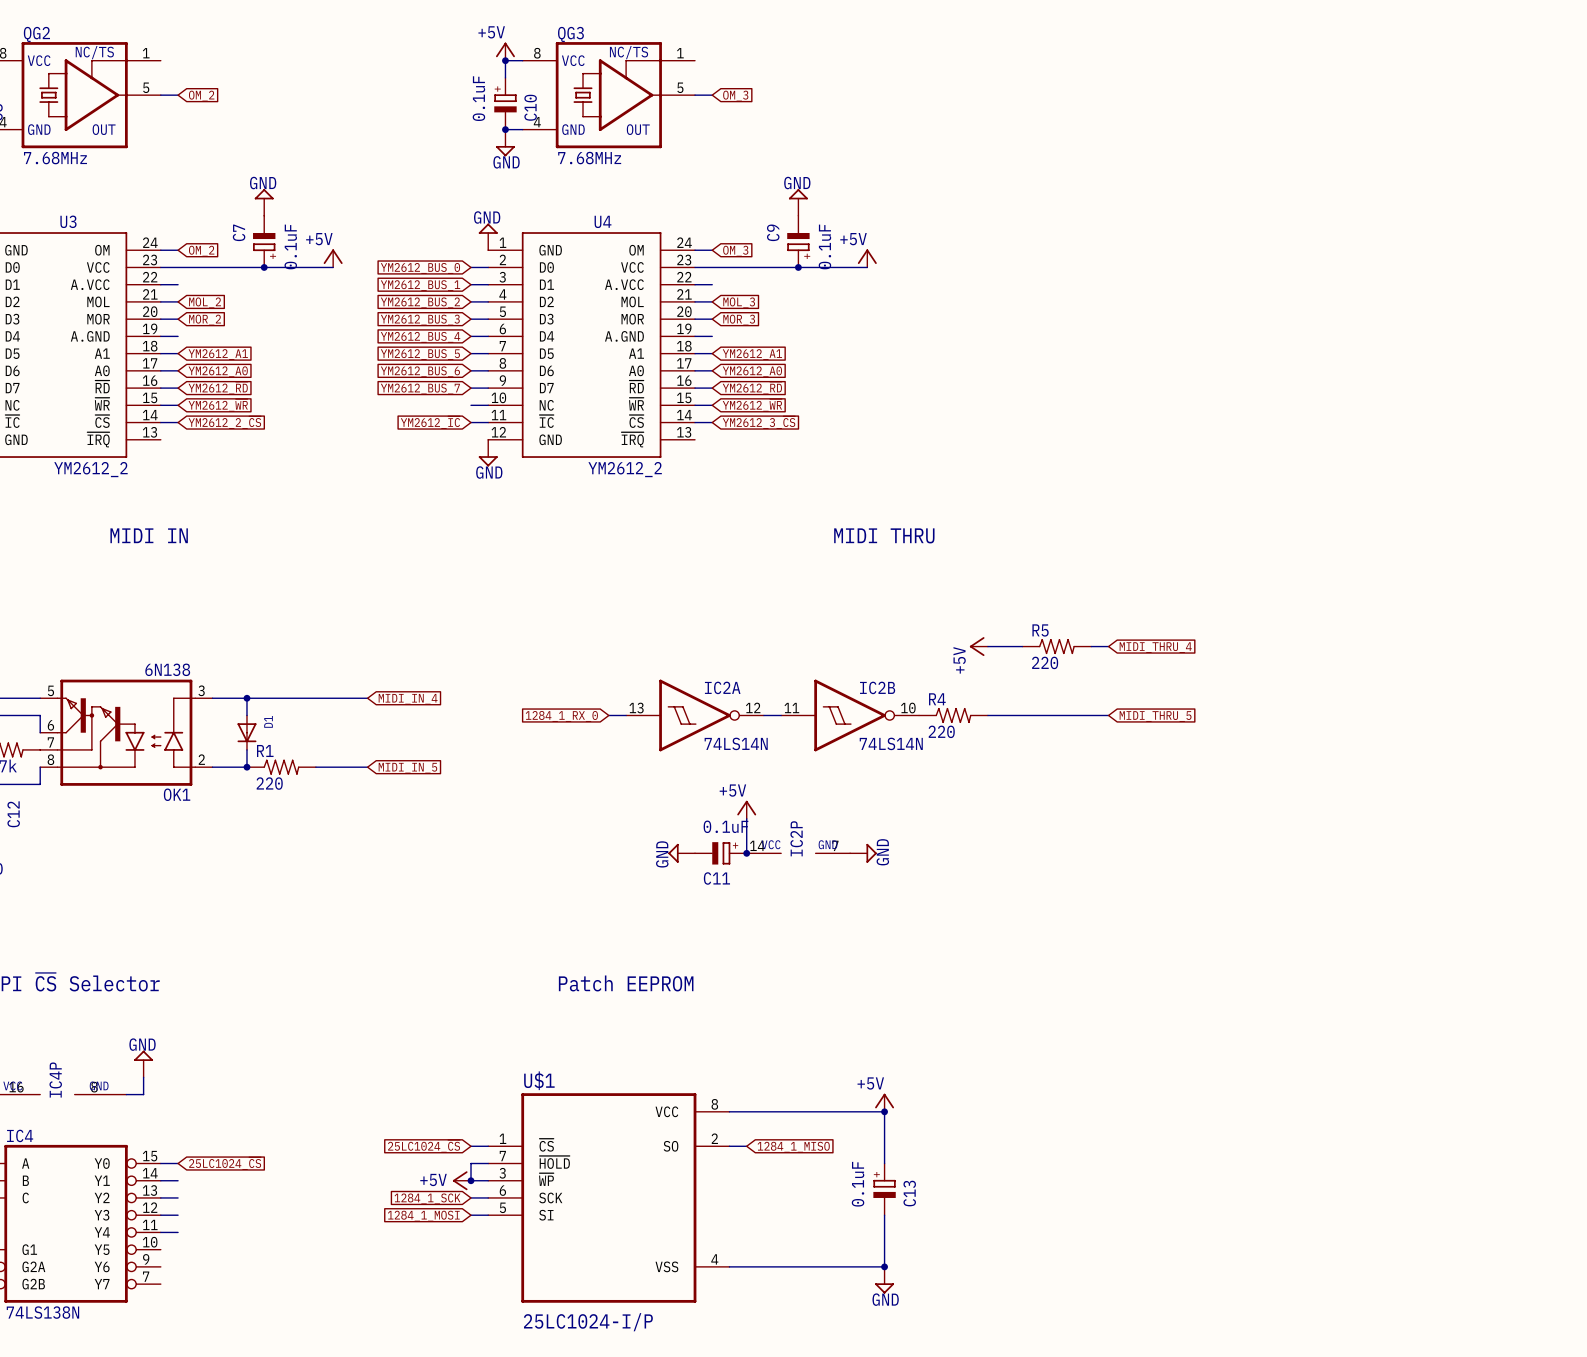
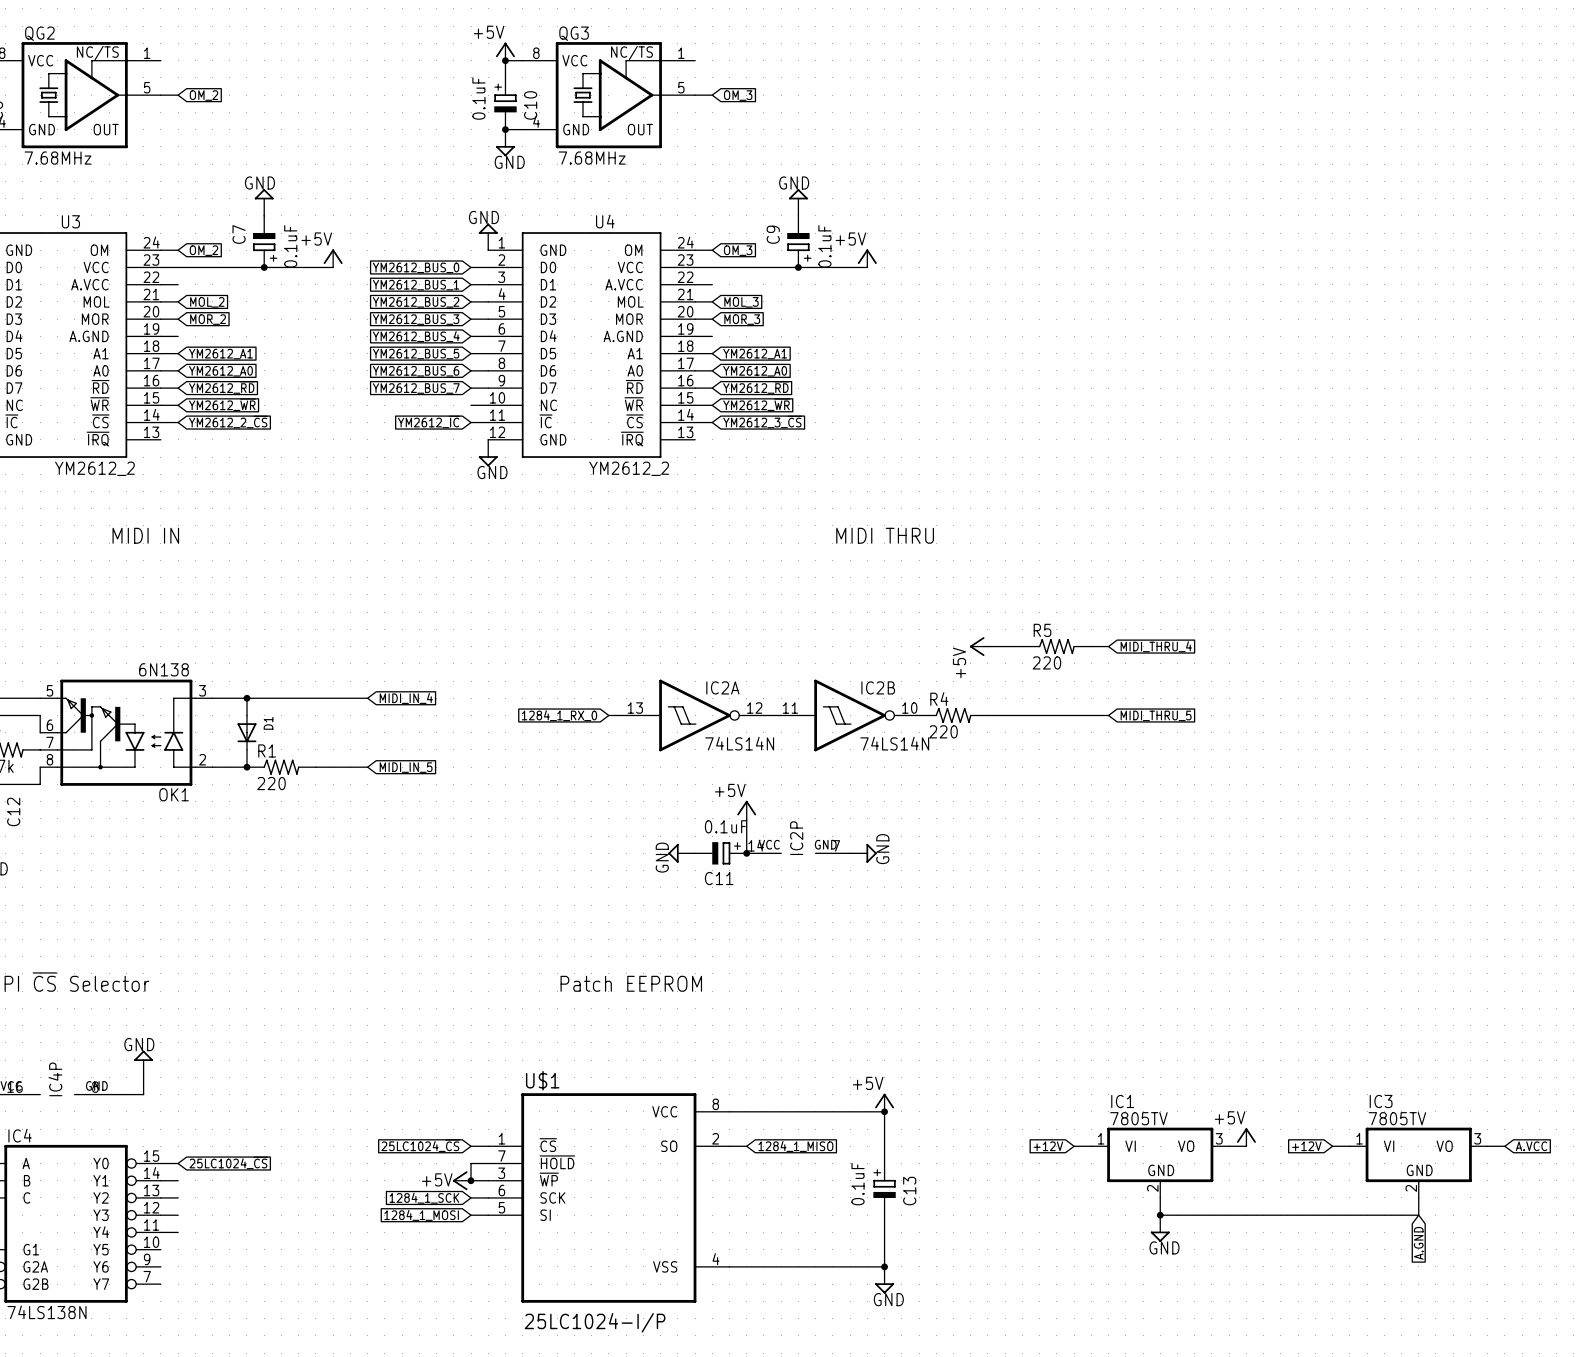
power symbol: none -> +5V (1246, 1137)
global label: none -> +12V (1048, 1146)
wire: none -> (1074, 1146) (1091, 1146)
wire: none -> (1229, 1146) (1246, 1146)
global label: none -> +12V (1306, 1146)
wire: none -> (1332, 1146) (1349, 1146)
wire: none -> (1487, 1146) (1504, 1146)
global label: none -> A.VCC (1531, 1146)
IC1: none -> 7805TV (1160, 1162)
IC3: none -> 7805TV (1418, 1162)
wire: none -> (1160, 1197) (1160, 1215) (1418, 1215) (1418, 1197)
junction: none -> (1160, 1215)
power symbol: none -> GND (1160, 1228)
global label: none -> A.GND (1418, 1243)

